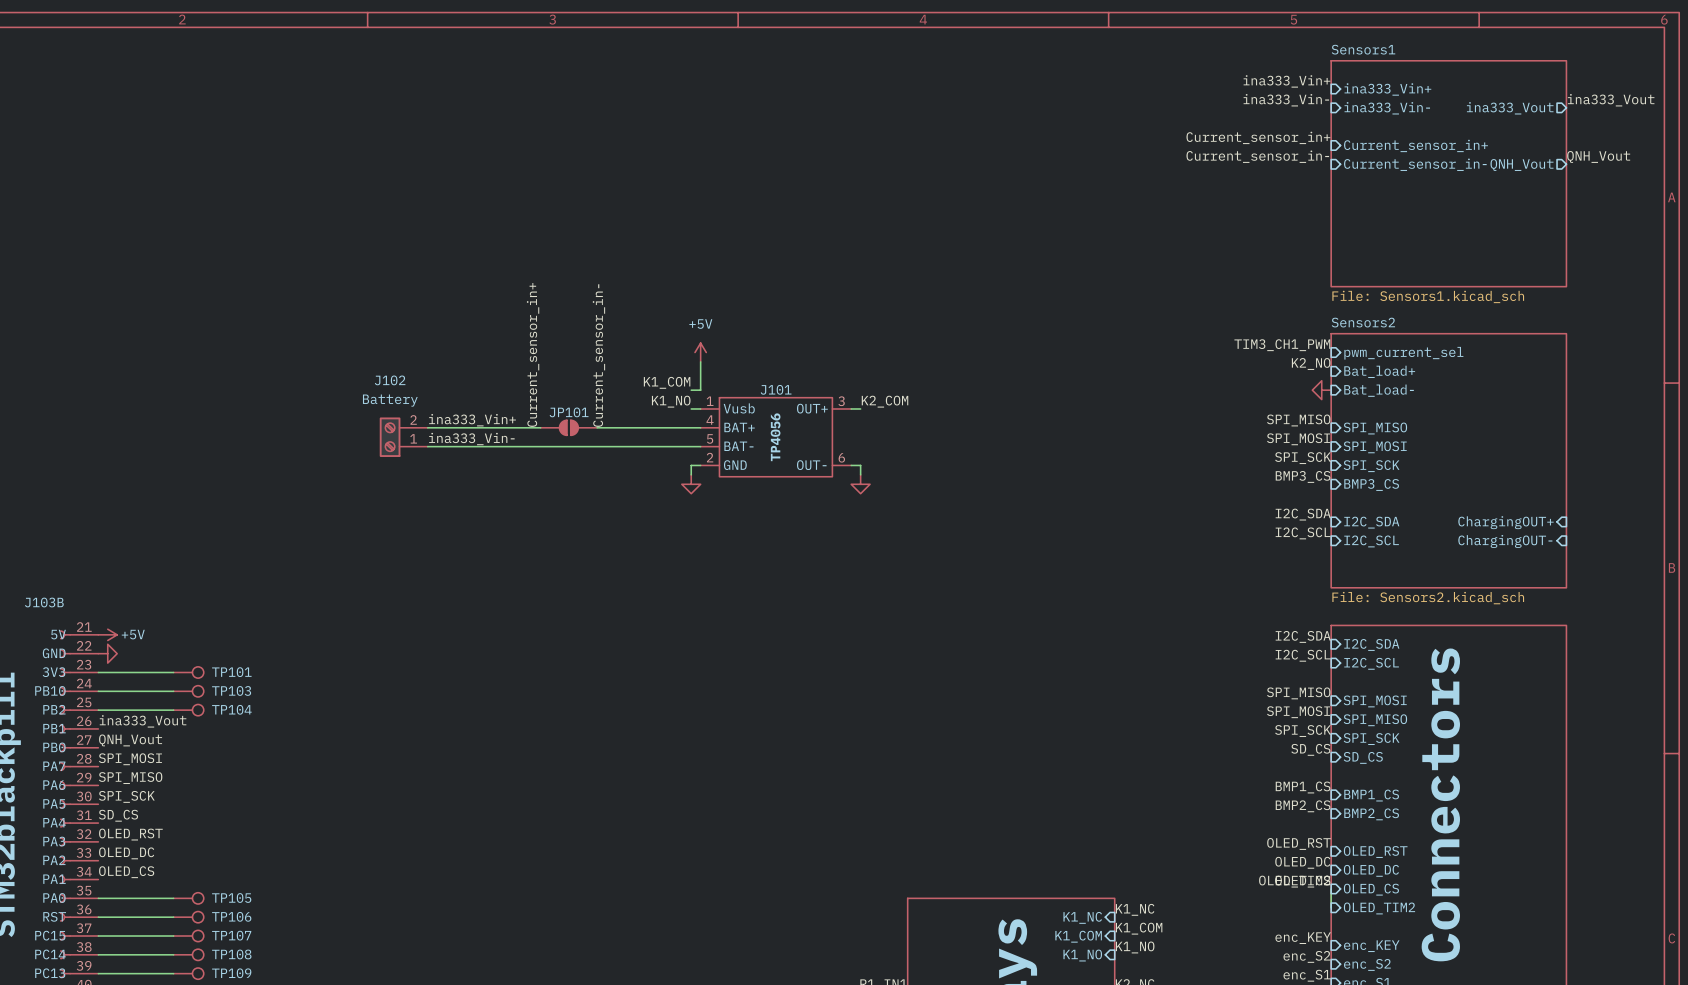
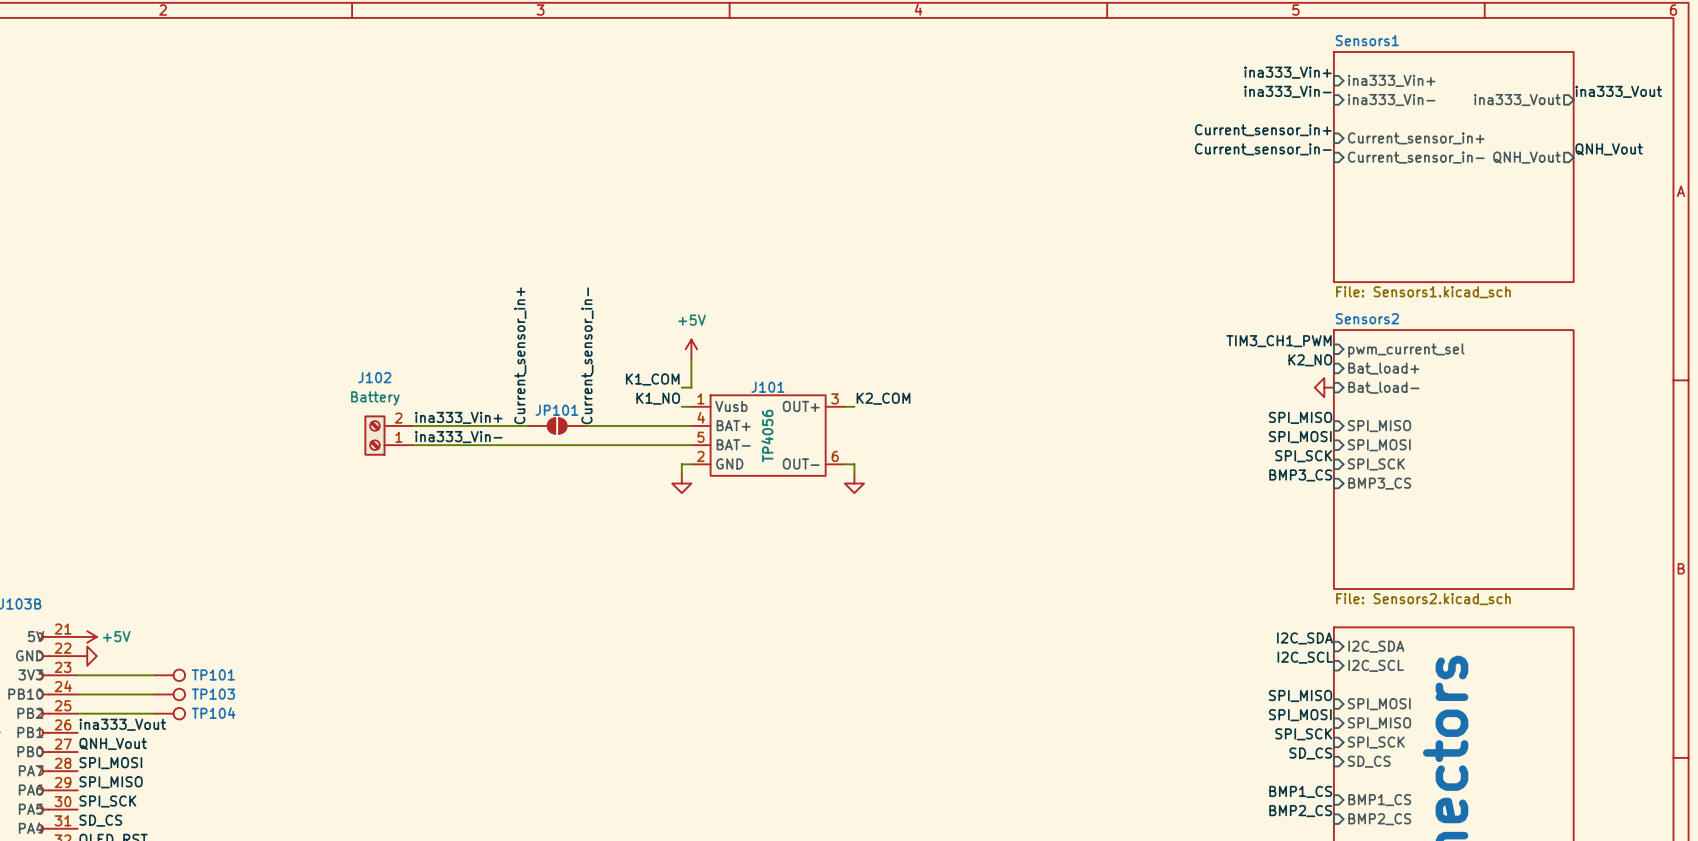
label: I2C_SDA (1303, 514) -> none
sheet pin: I2C_SDA (1371, 522) -> none
sheet pin: ChargingOUT+ (1506, 522) -> none
label: I2C_SCL (1302, 533) -> none
sheet pin: I2C_SCL (1371, 541) -> none
sheet pin: ChargingOUT- (1505, 541) -> none

